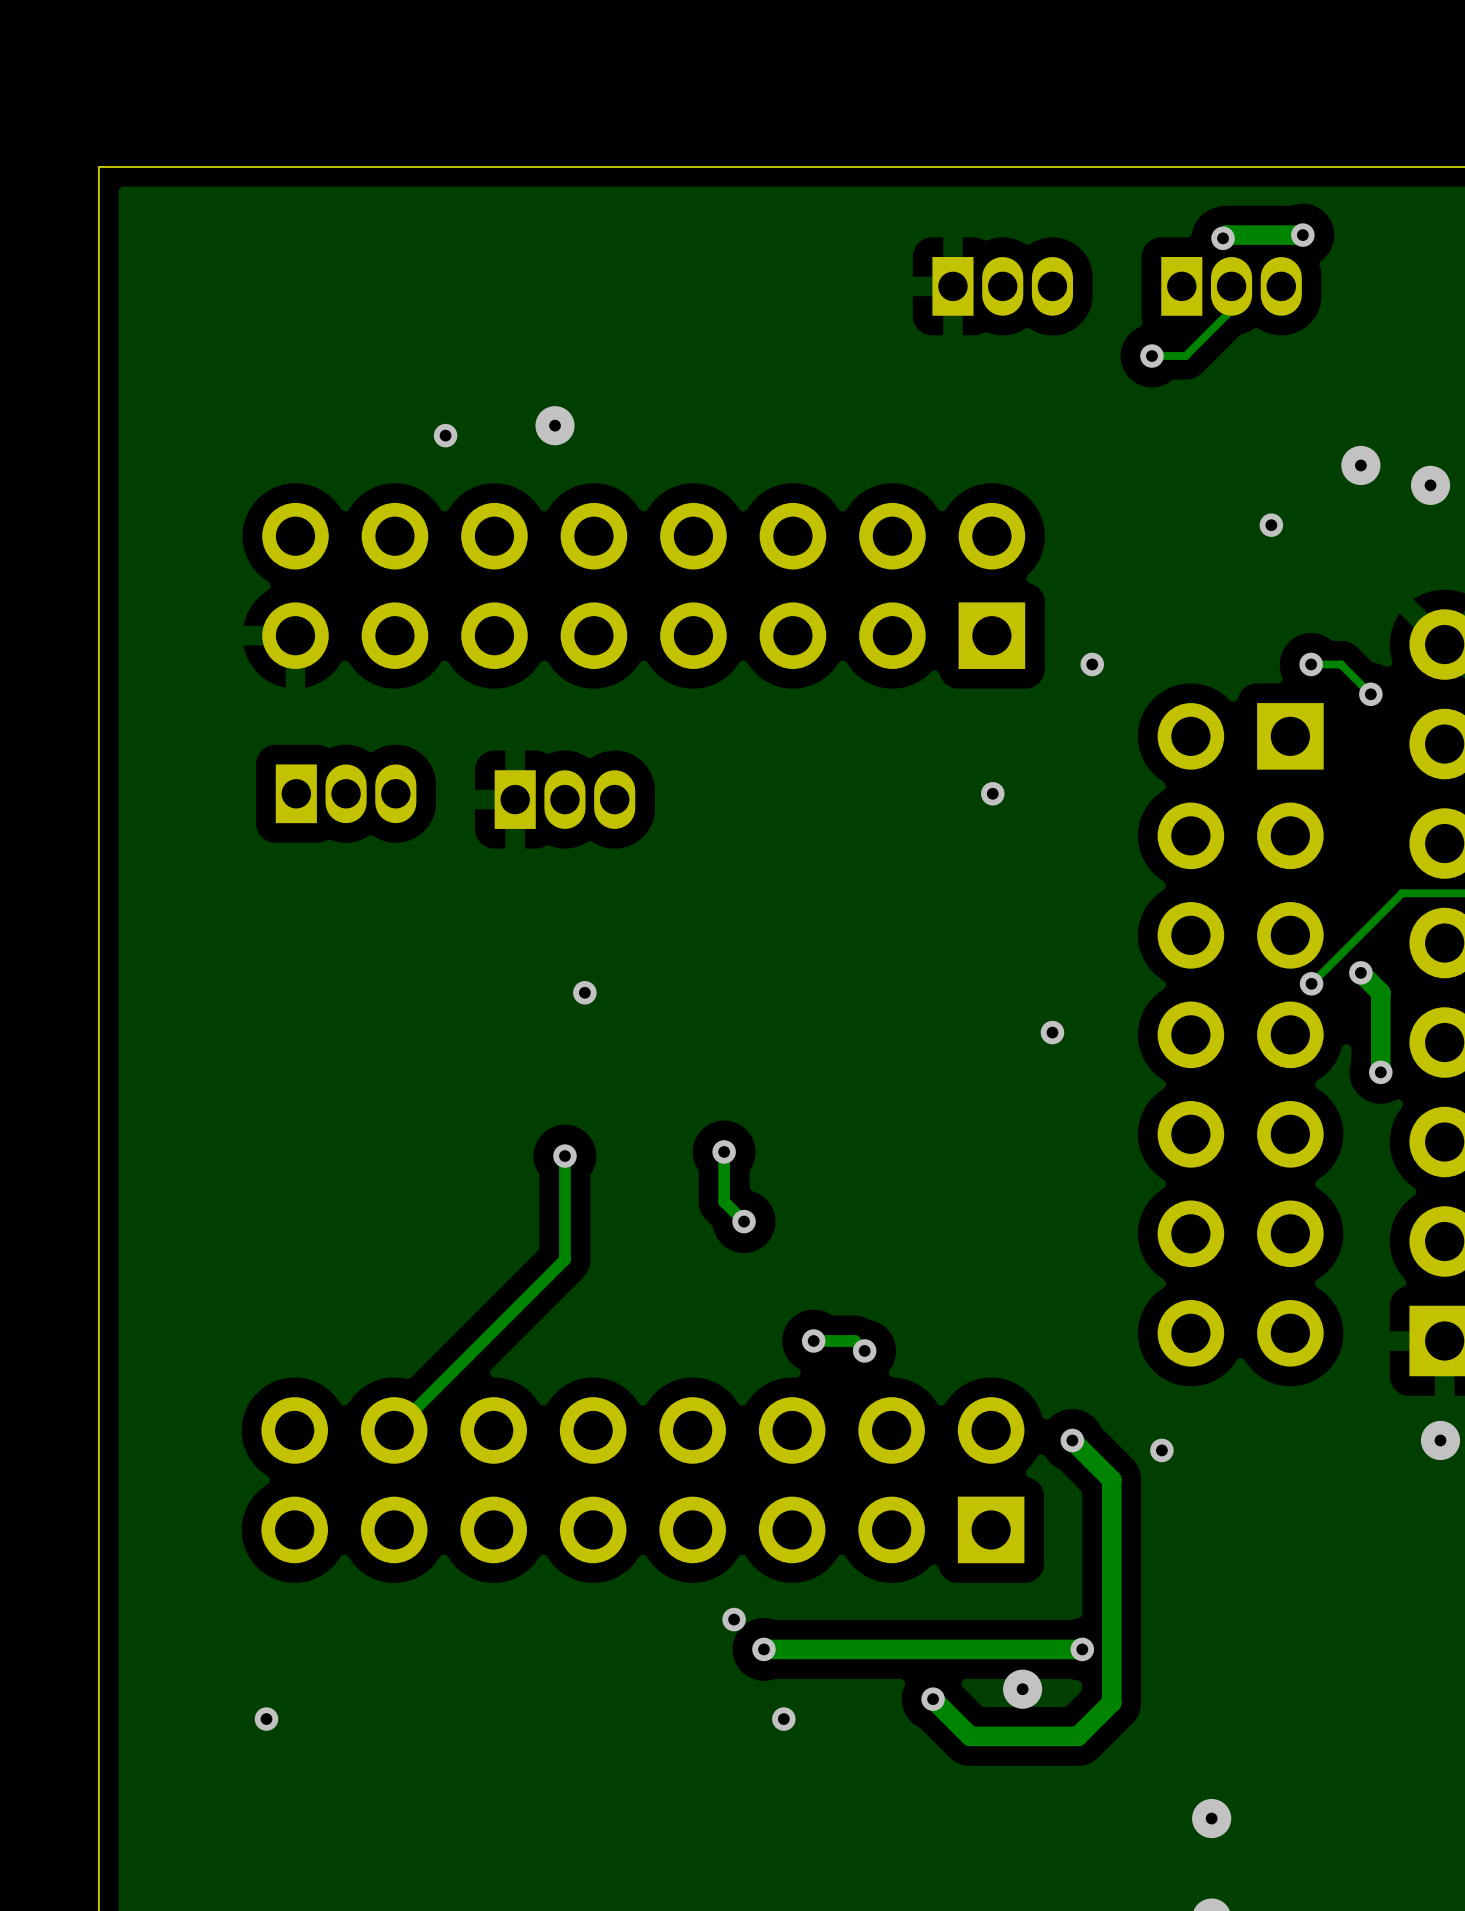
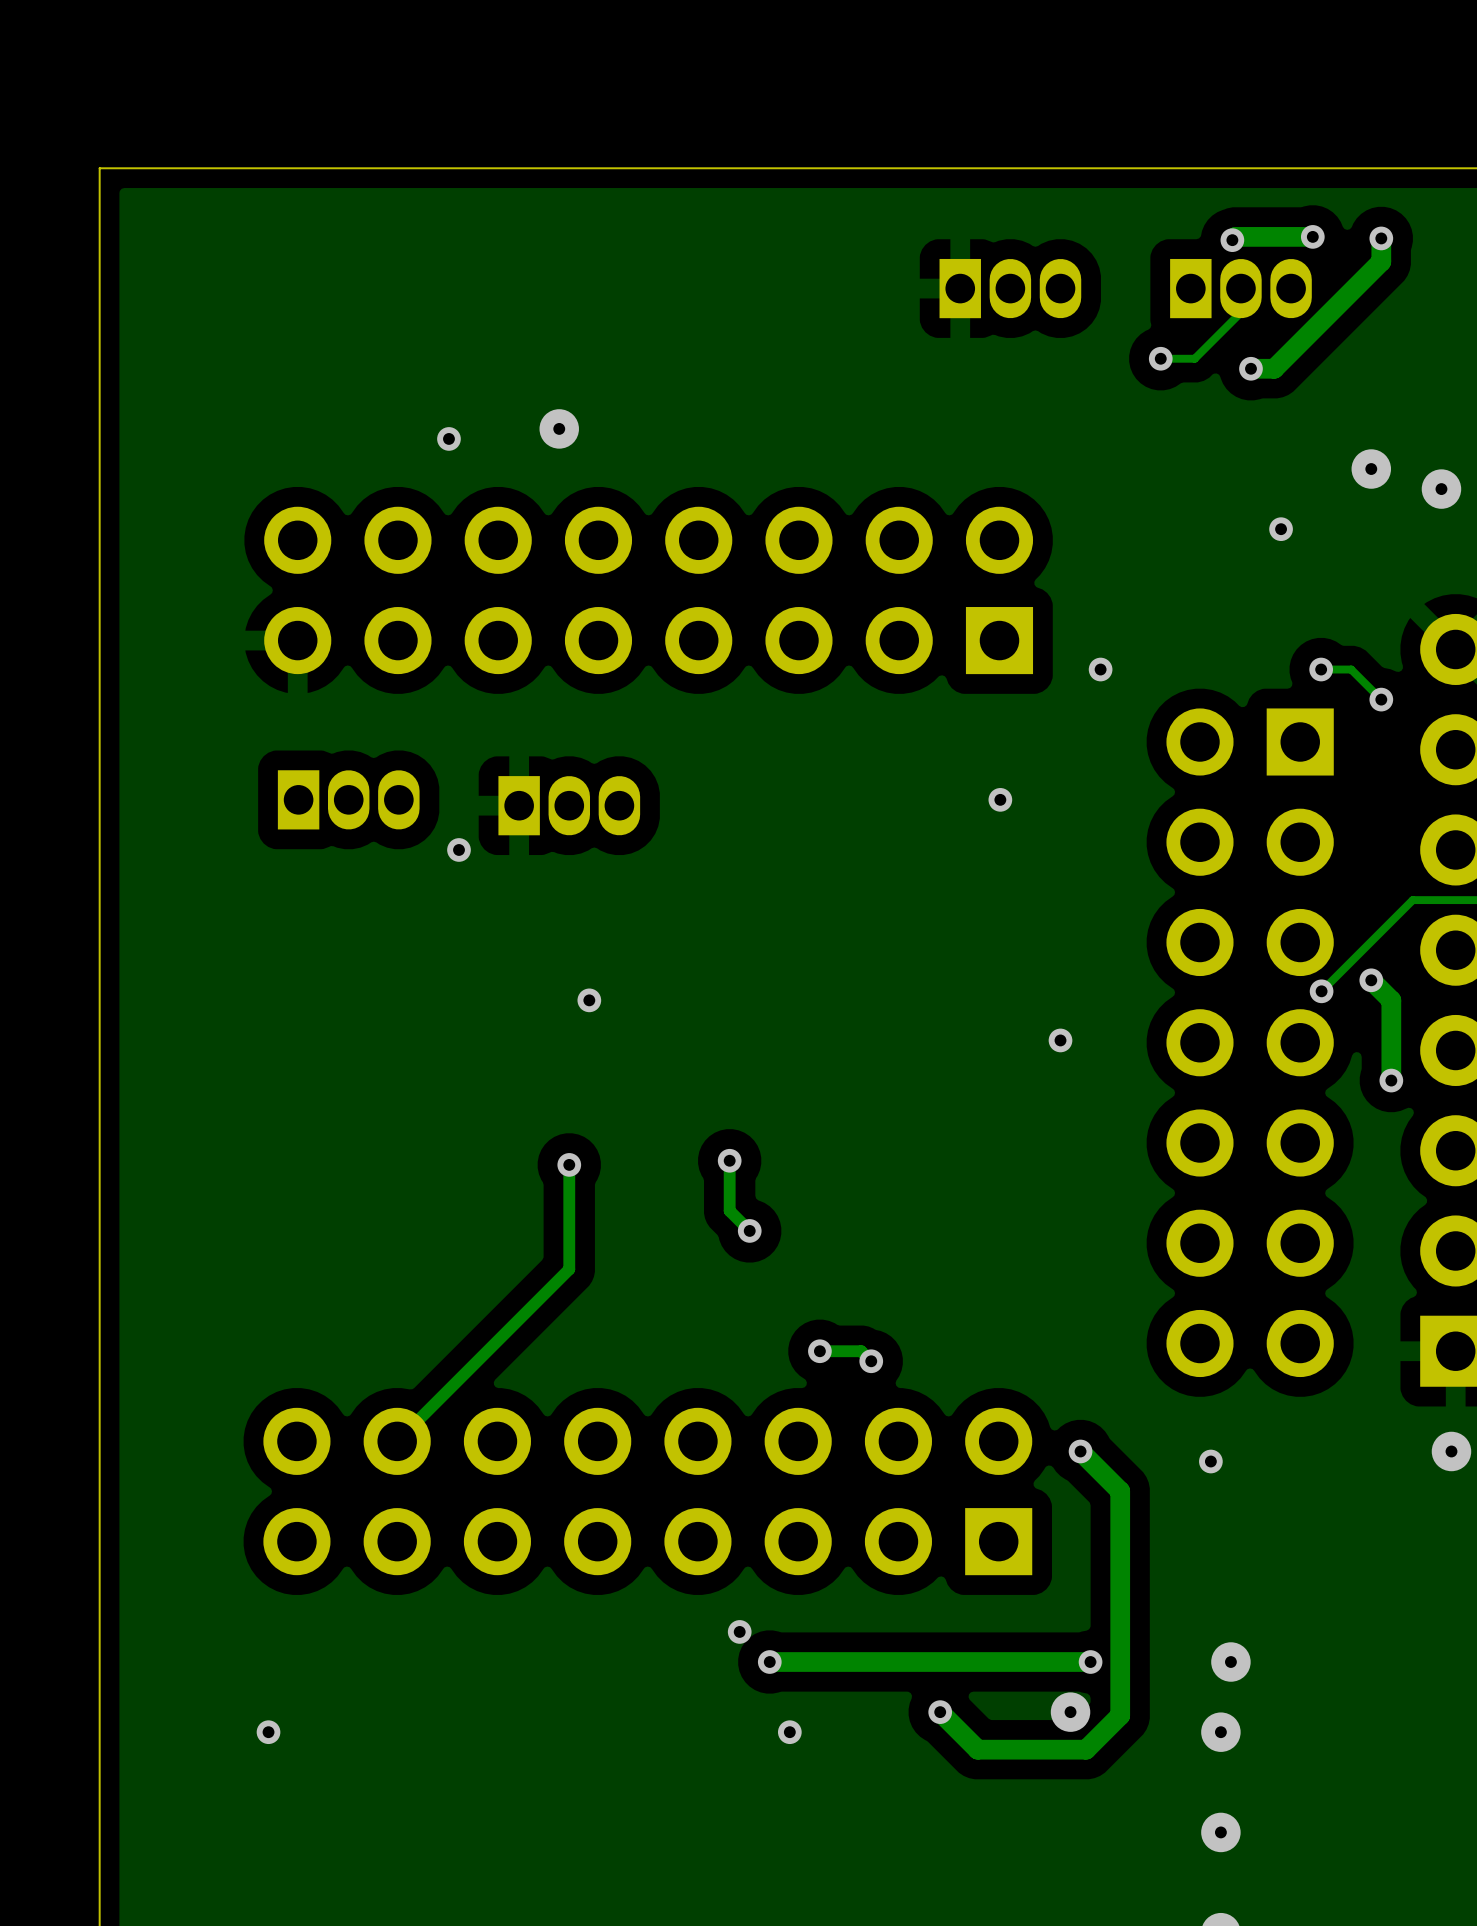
track: none -> (1381, 238) (1381, 261) (1274, 368) (1250, 368)
via: none -> (1381, 238)
via: none -> (1250, 368)
via: none -> (459, 849)
via position: (1161, 1450) -> (1210, 1461)
via: none -> (1230, 1662)
via position: (1022, 1689) -> (1070, 1712)
via: none -> (1220, 1732)

